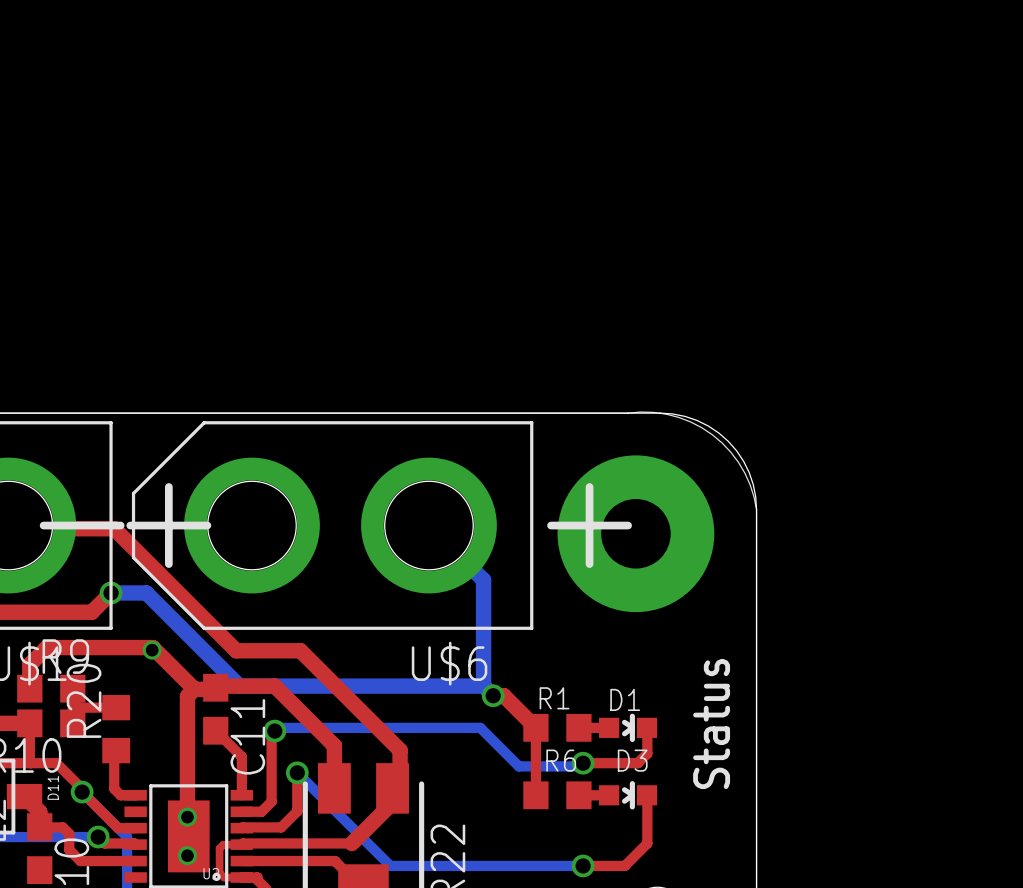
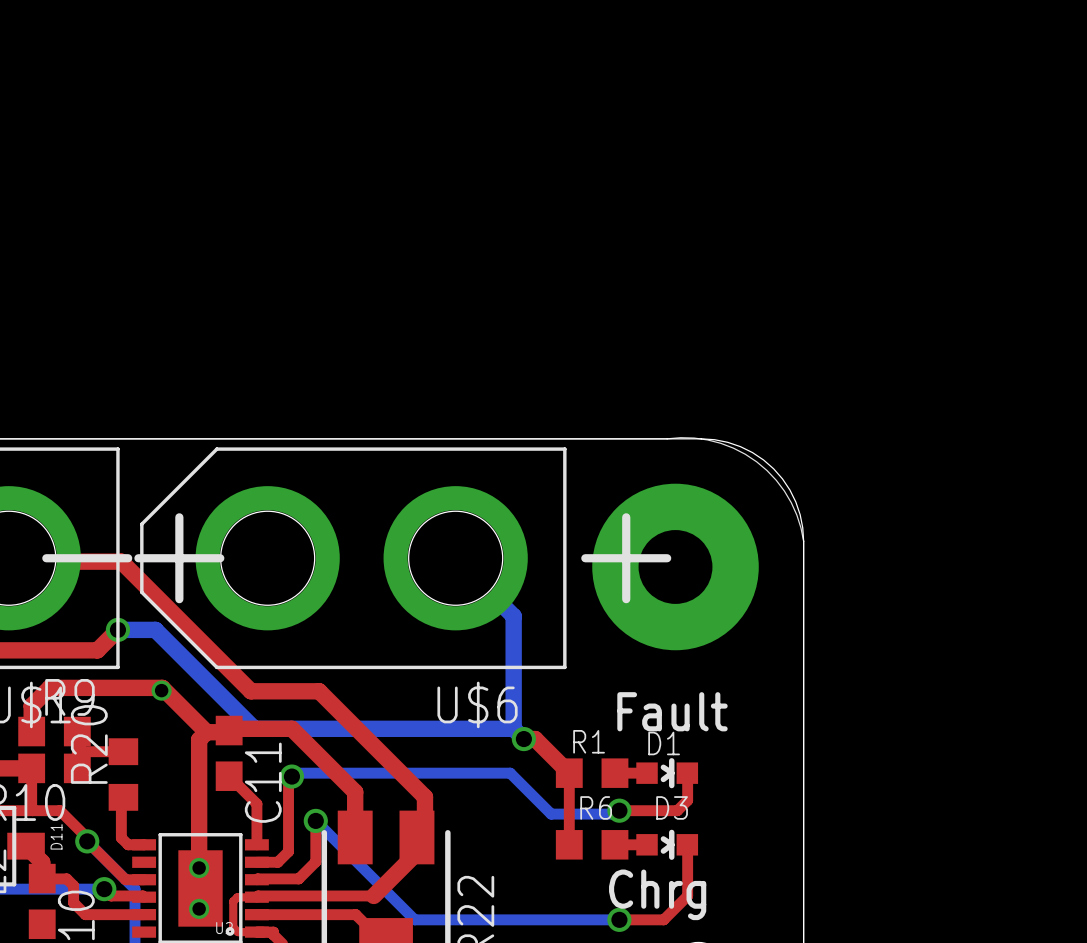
text: none -> Fault (672, 711)
text: Status (711, 724) -> none
text: none -> Chrg (657, 894)

